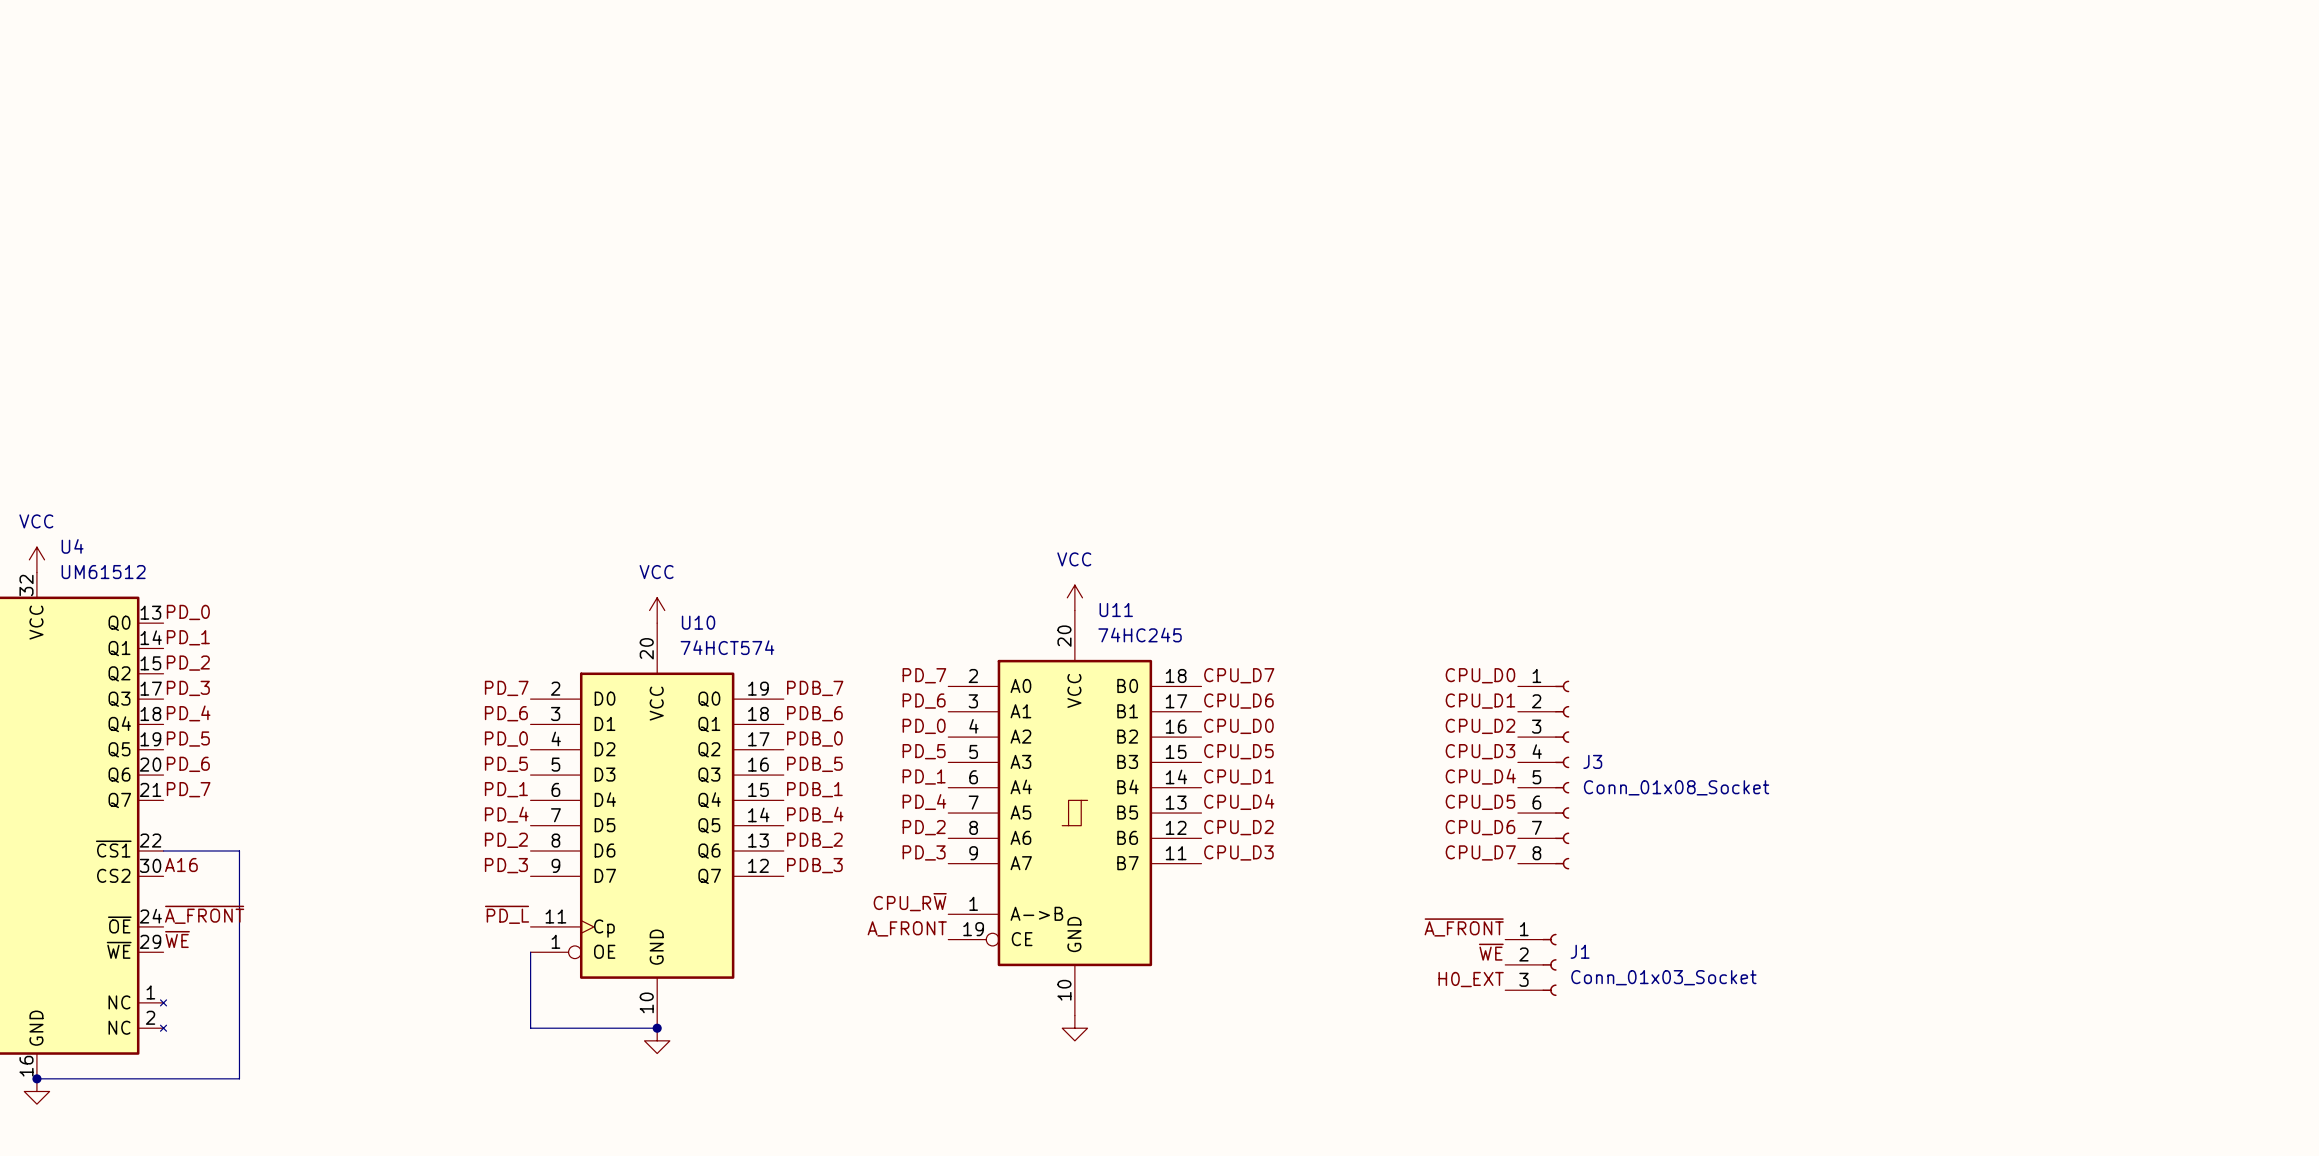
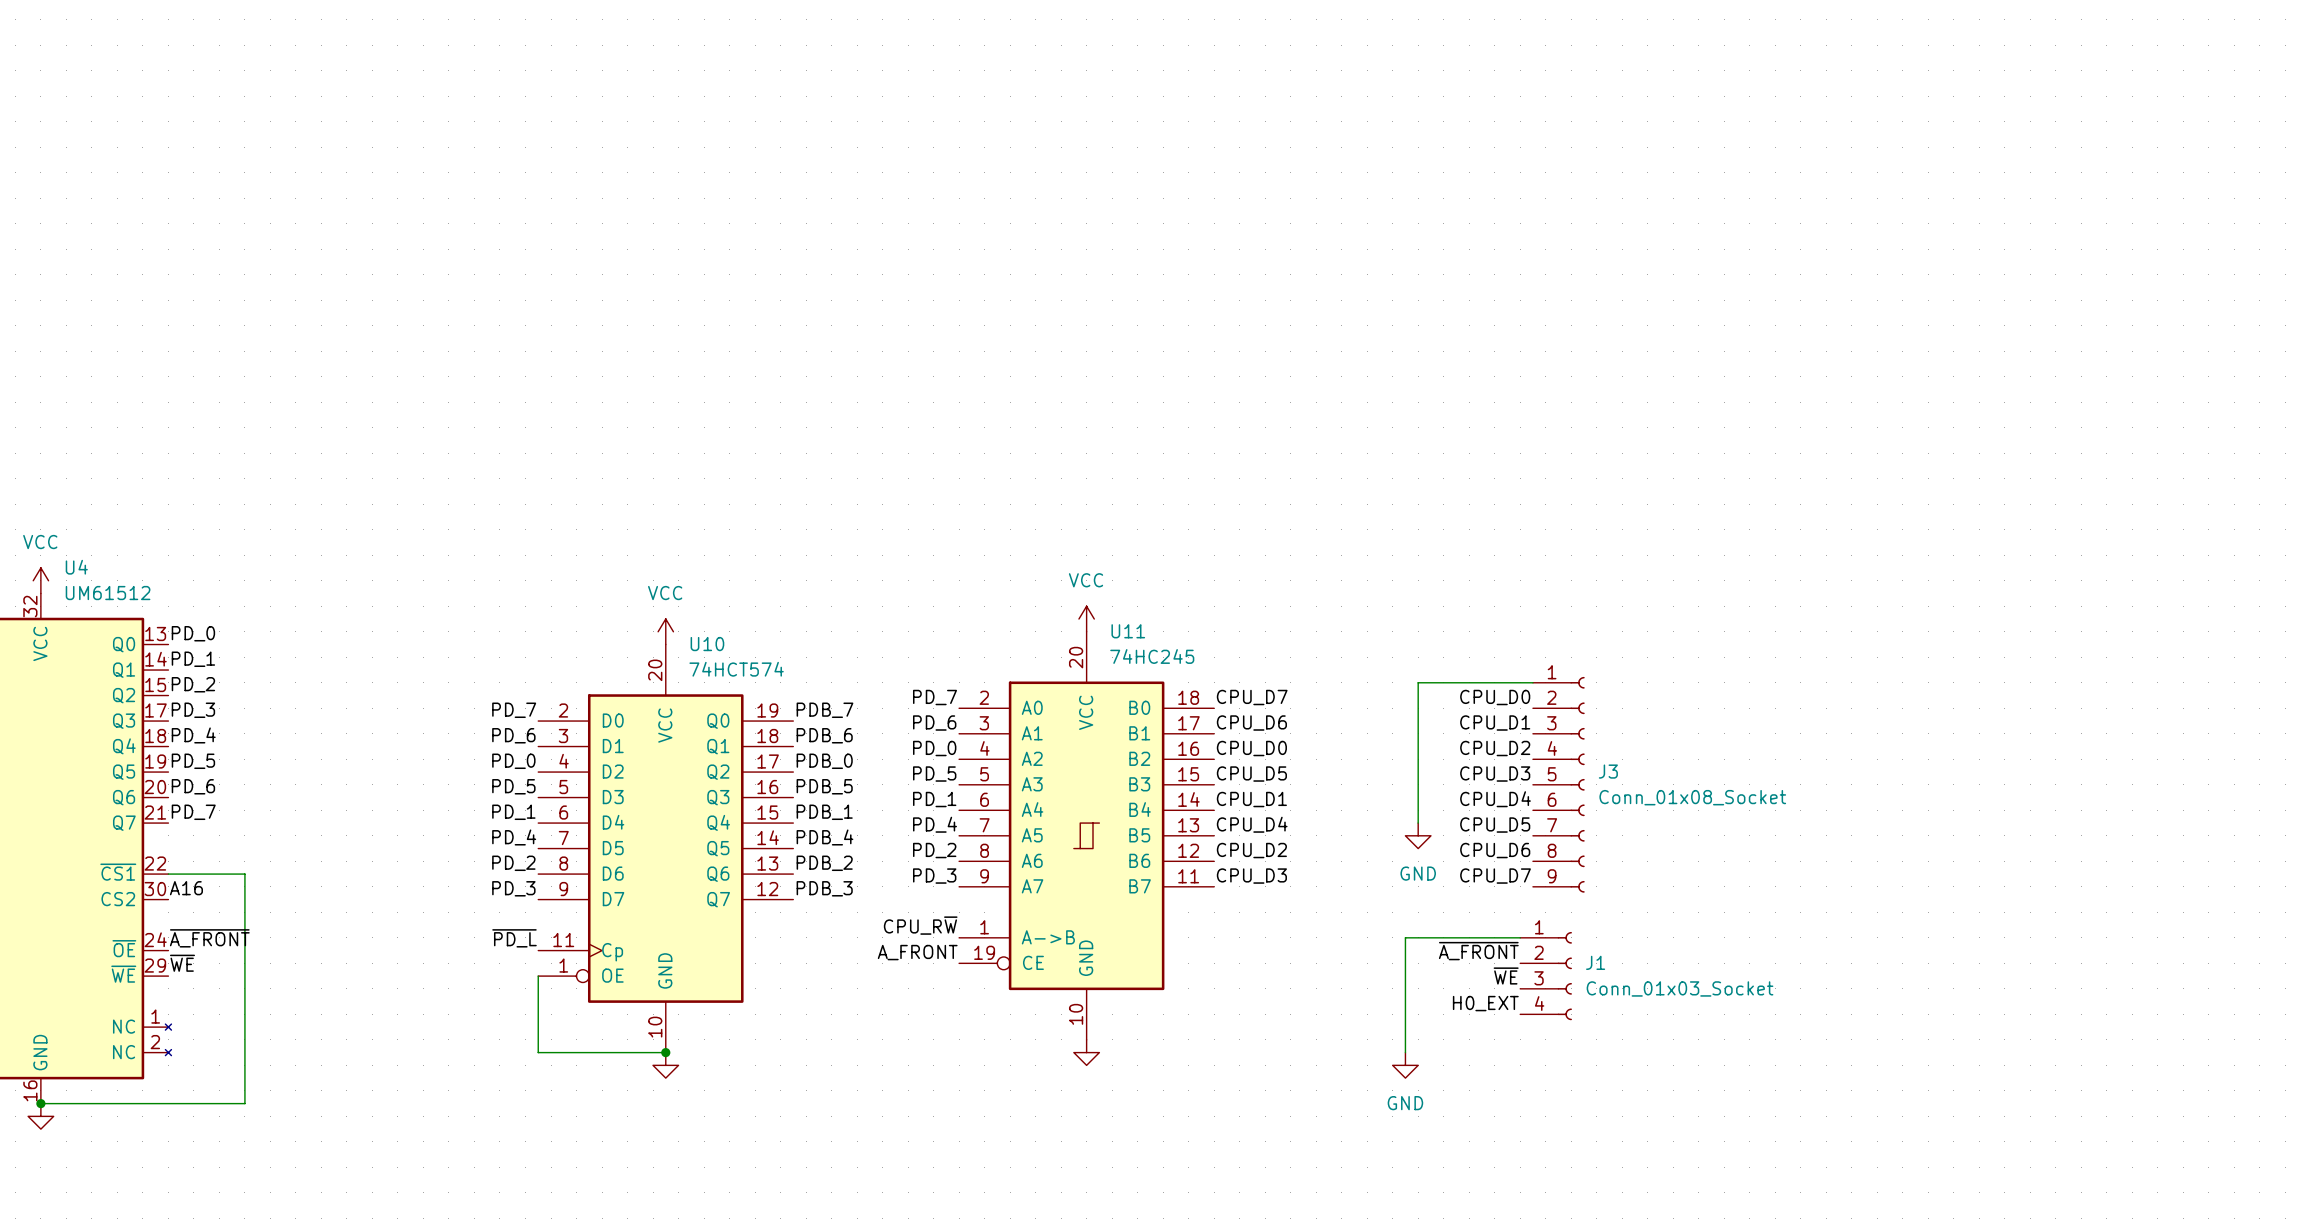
wire: none -> (1532, 682) (1418, 682) (1418, 823)
J3 symbol: [1517, 680, 1570, 870] -> [1532, 676, 1585, 893]
power symbol: none -> GND (1418, 835)
wire: none -> (1520, 937) (1405, 937) (1405, 1052)
J1 symbol: [1505, 933, 1557, 997] -> [1520, 931, 1572, 1021]
power symbol: none -> GND (1405, 1065)

